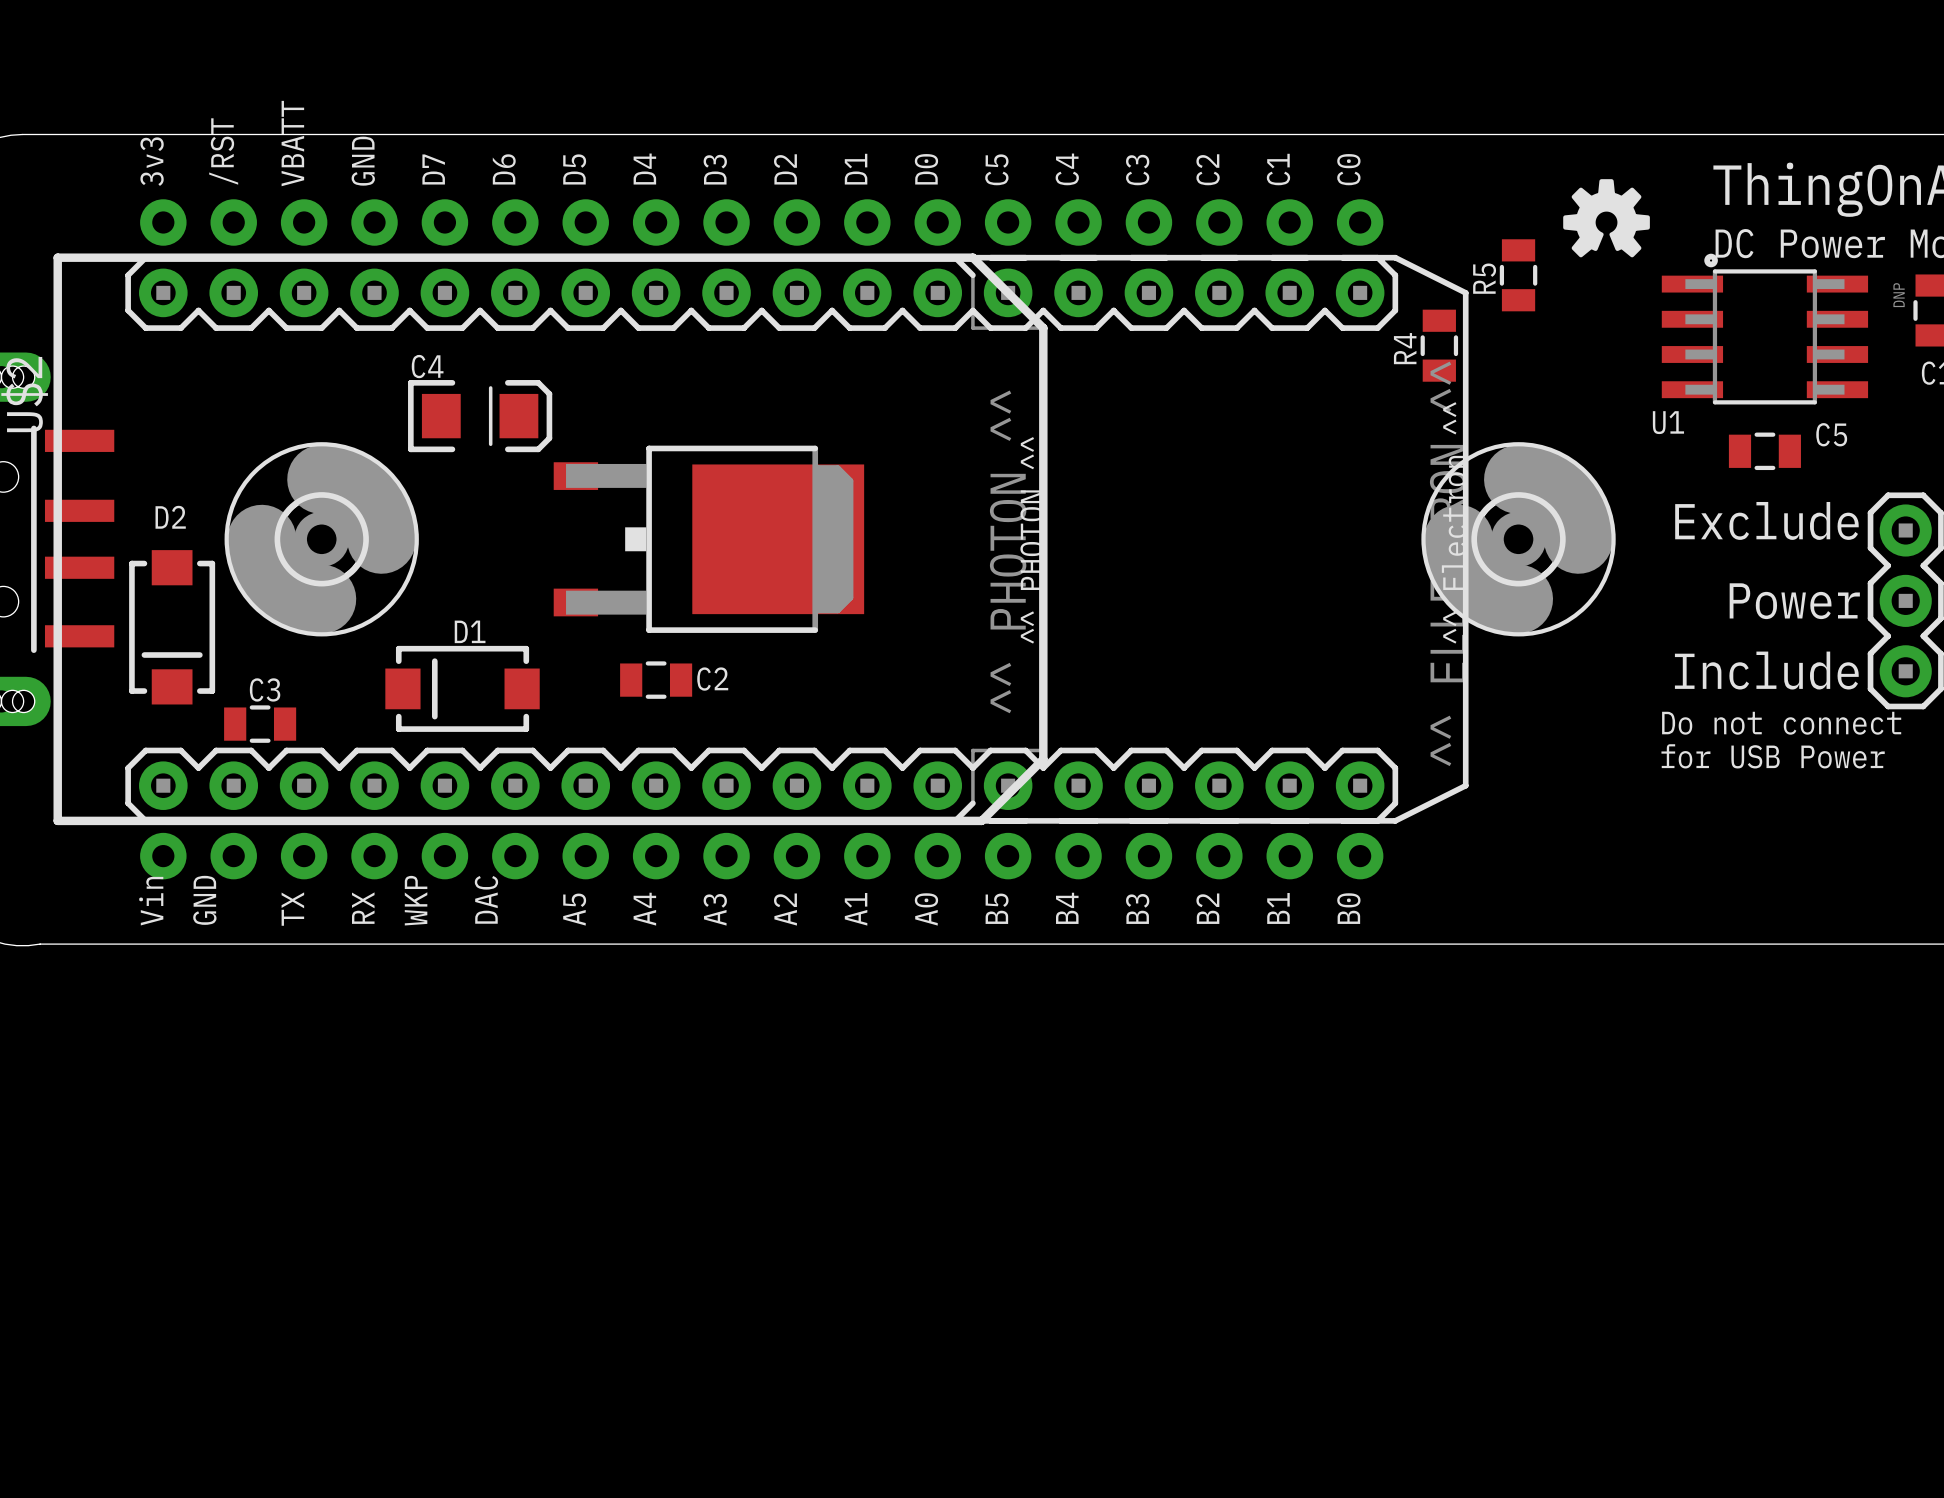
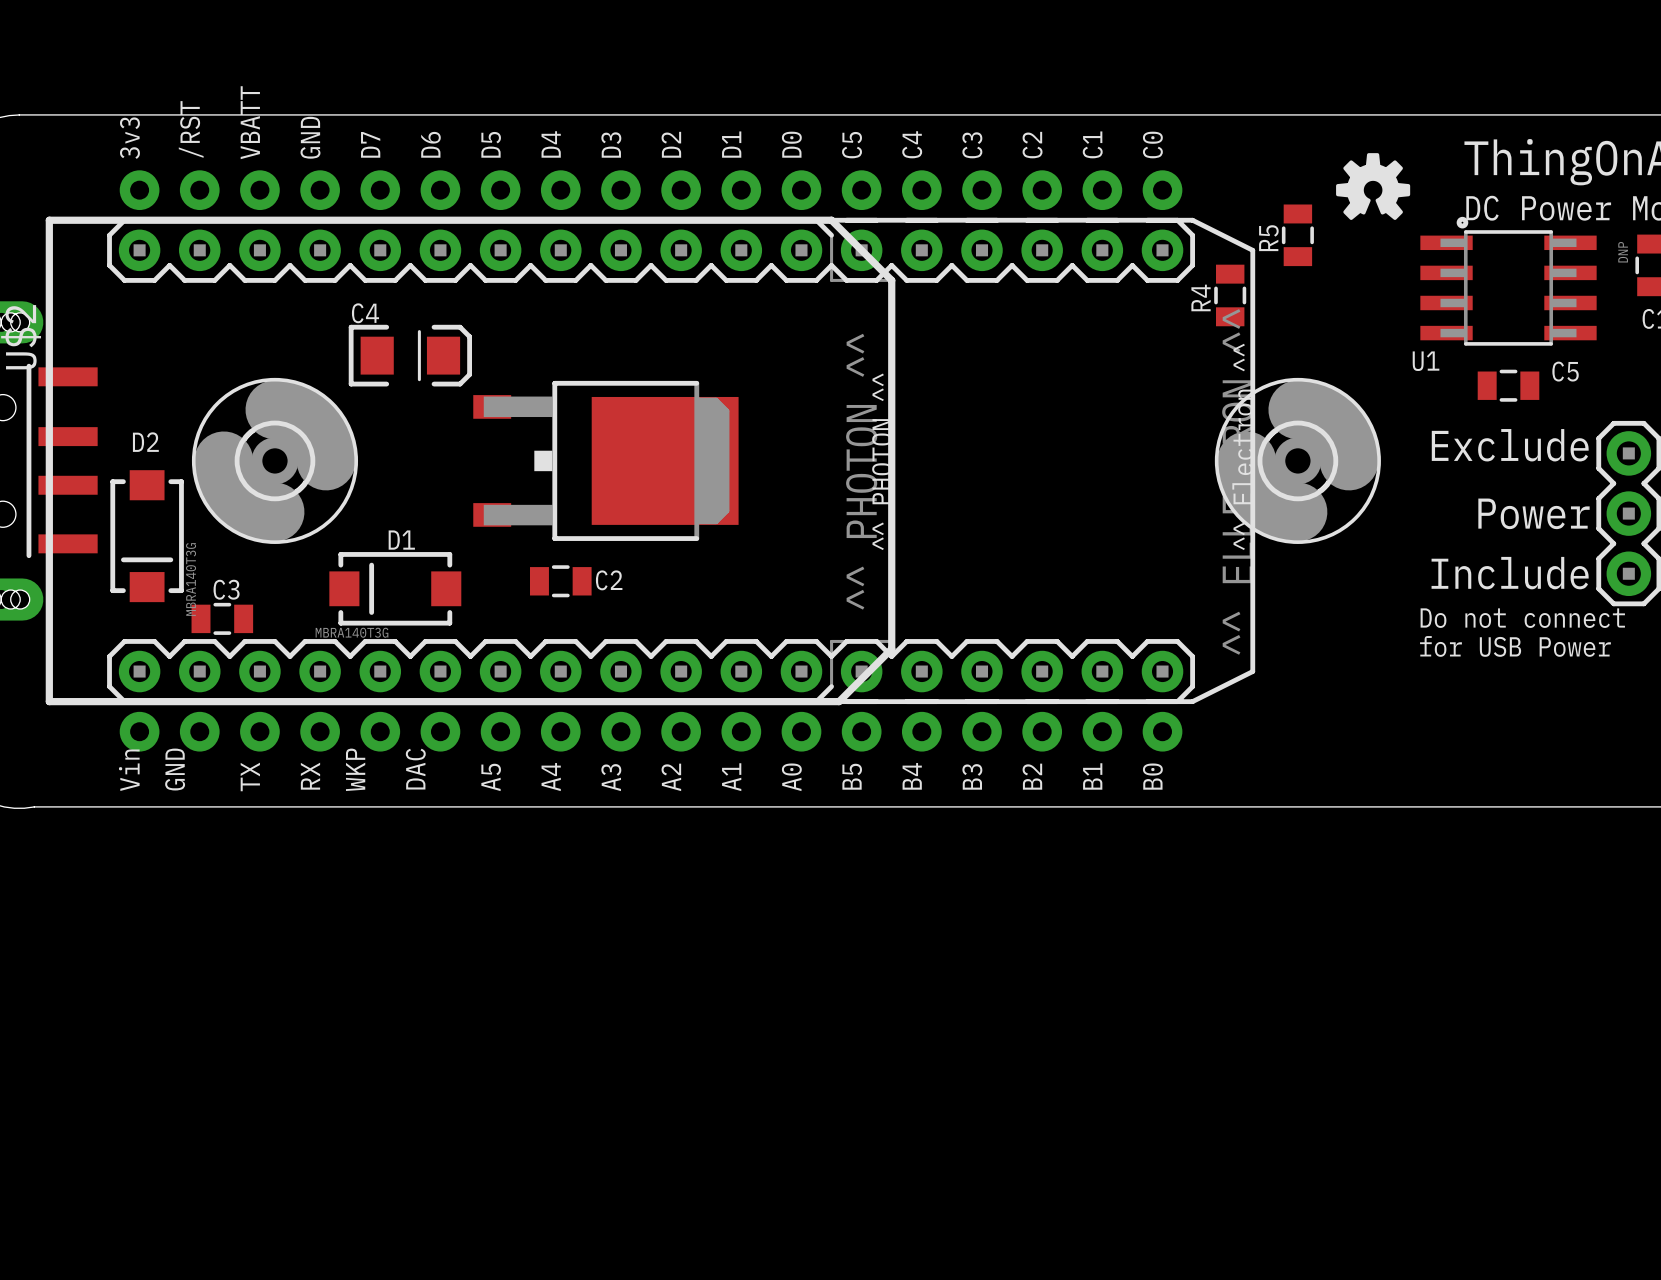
D2 value: none -> MBRA140T3G (191, 579)
D1 value: none -> MBRA140T3G (352, 632)

